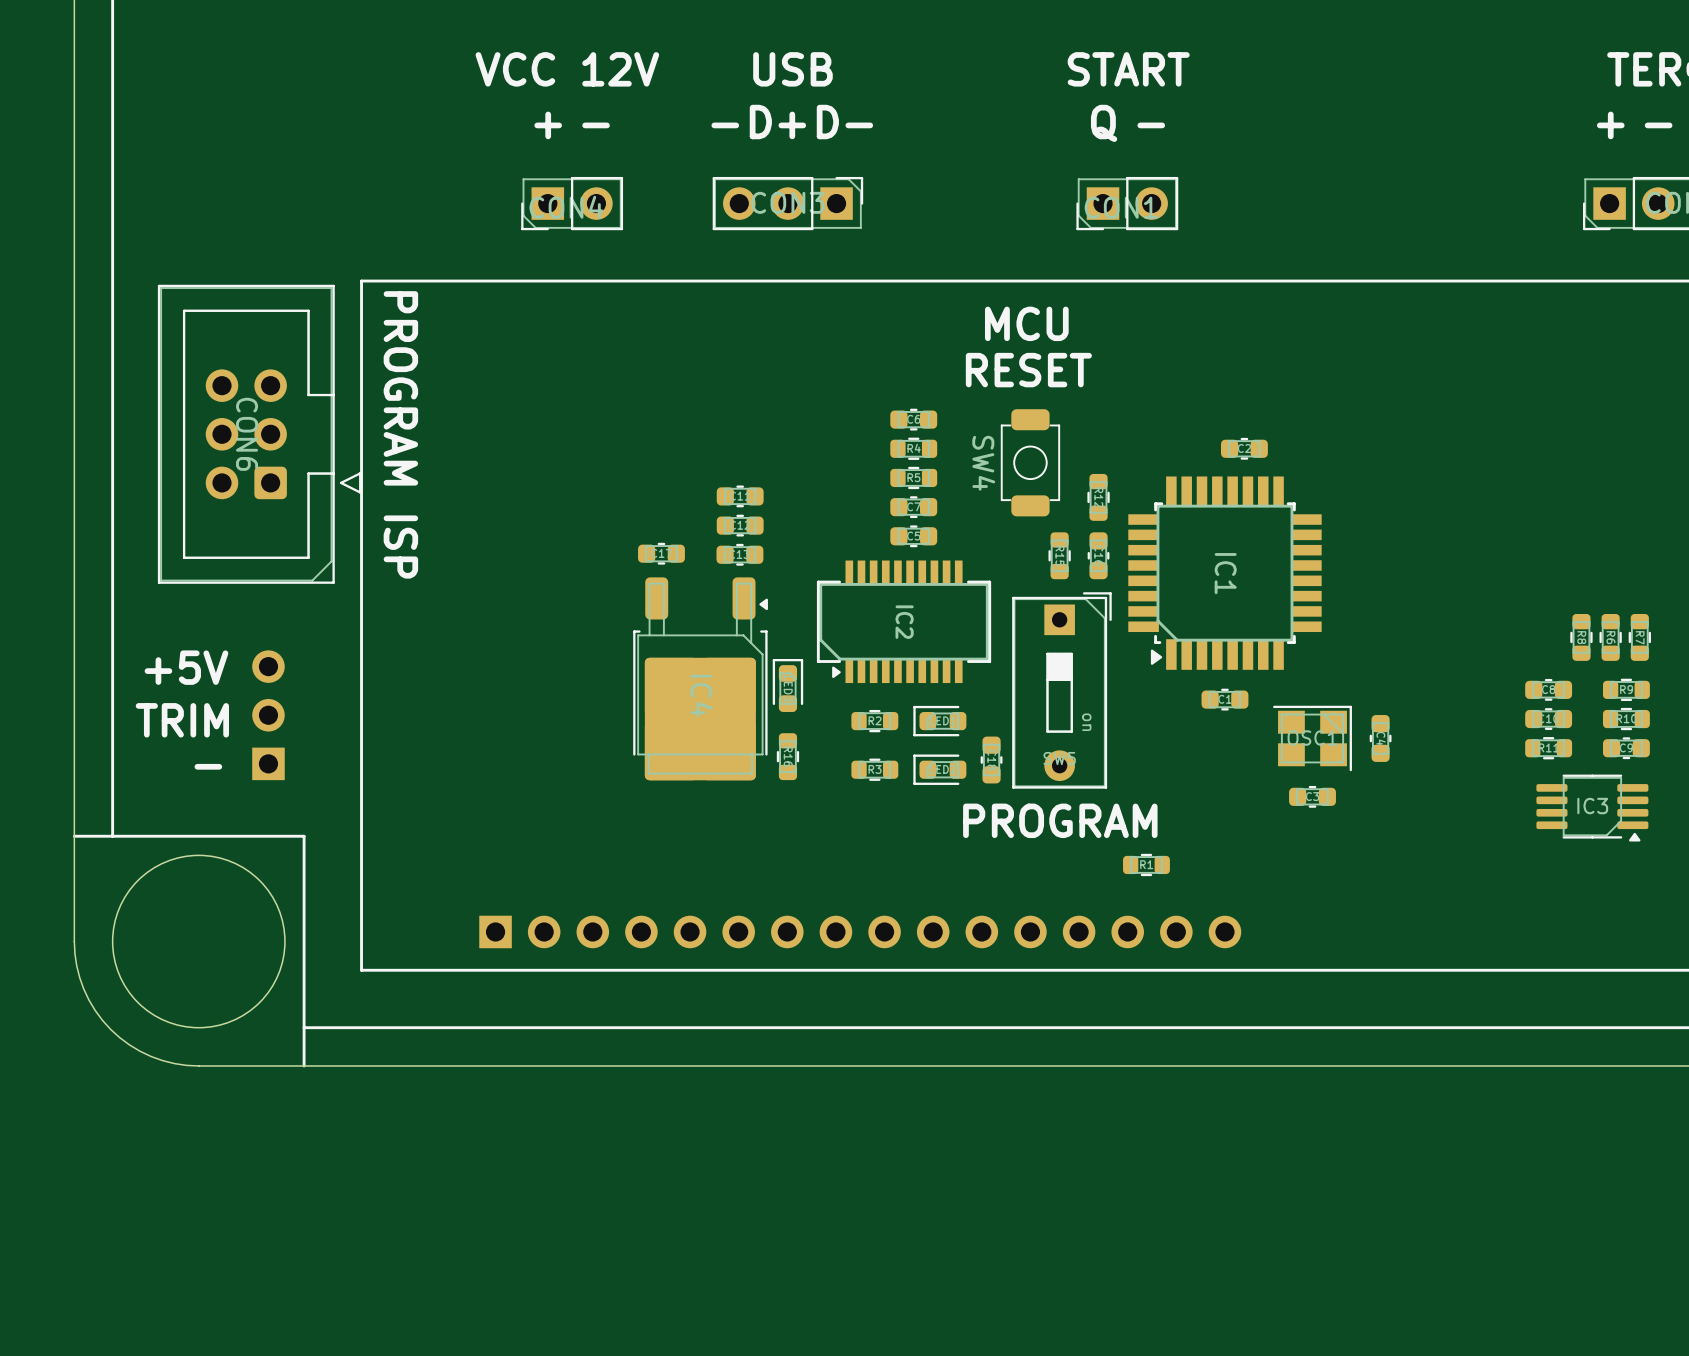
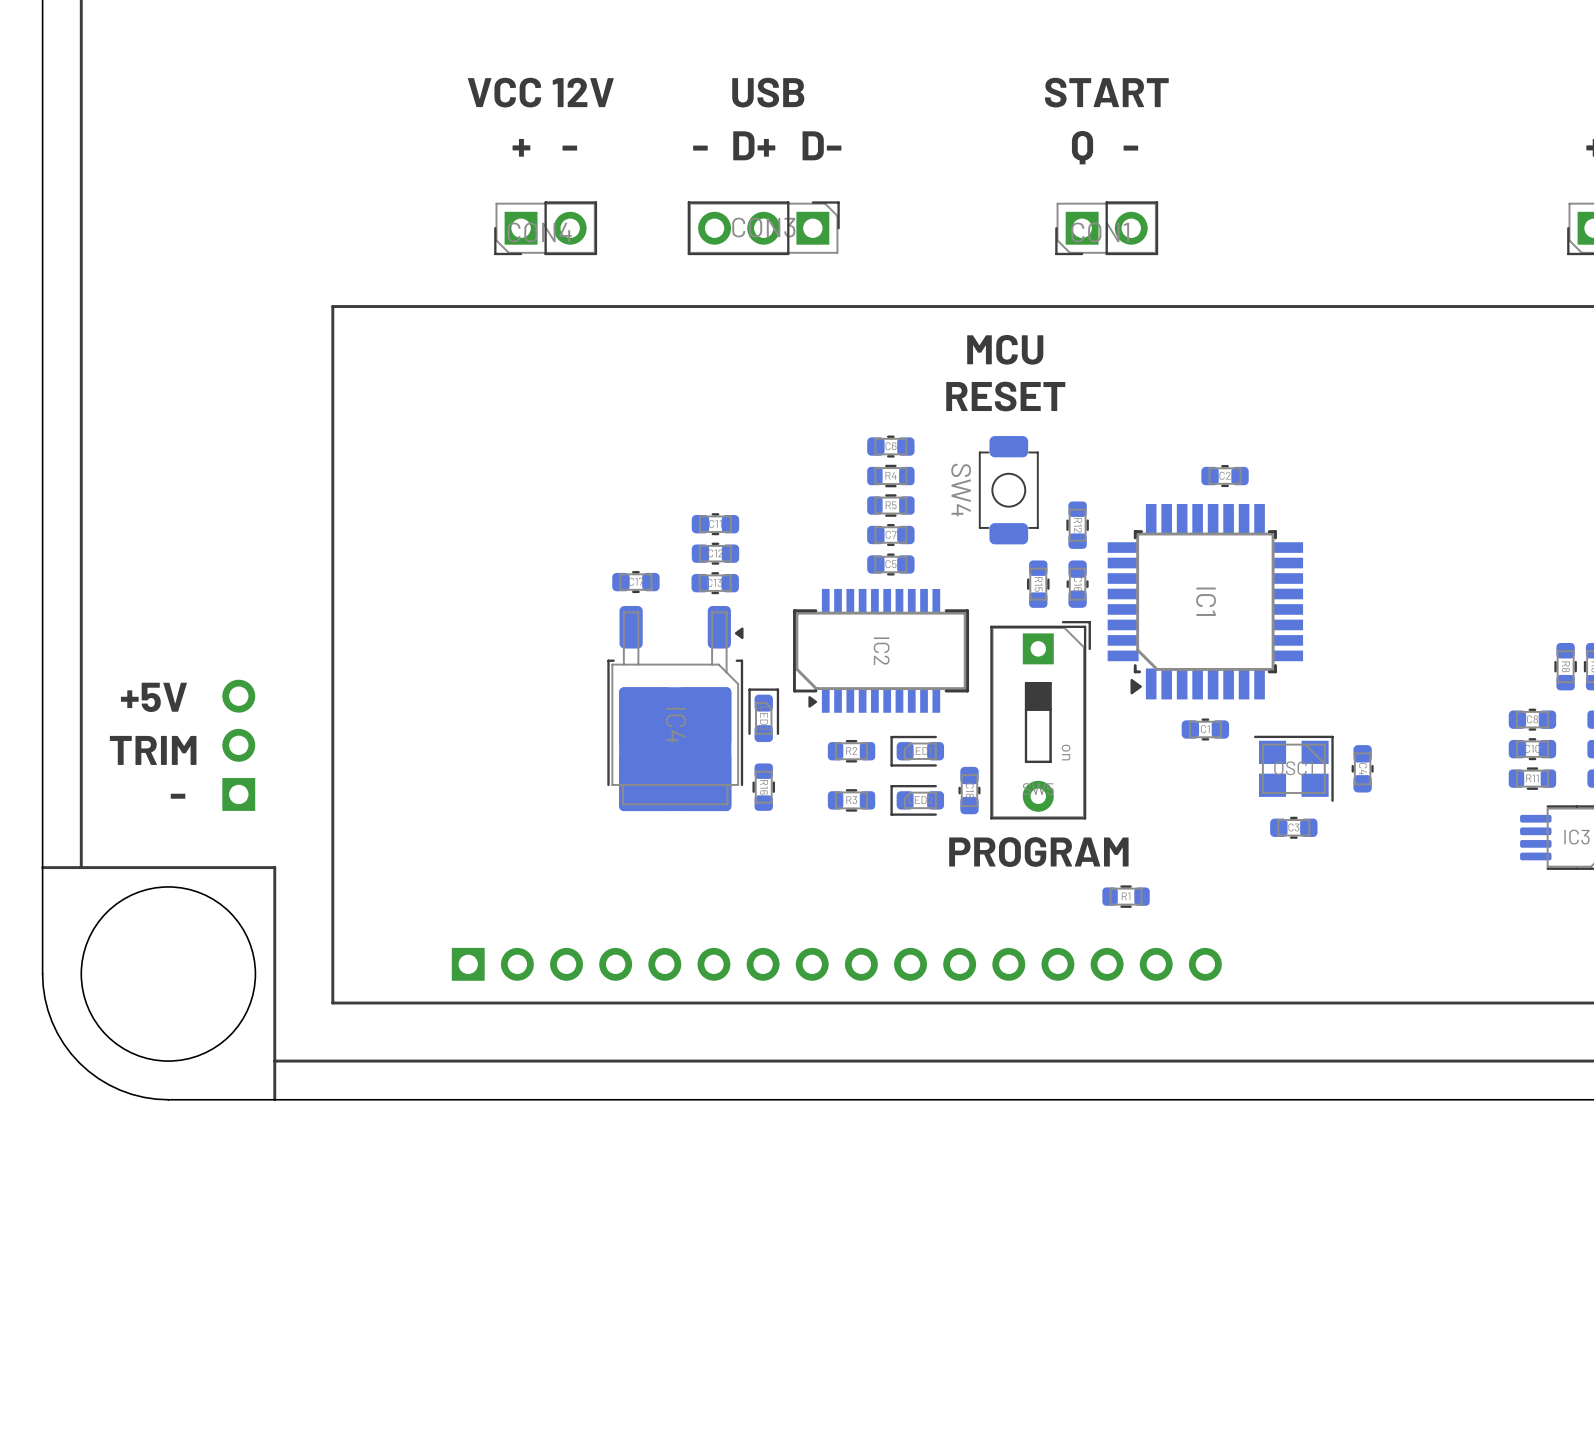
CON6: (259, 434) -> none
text: PROGRAM ISP (400, 434) -> none

